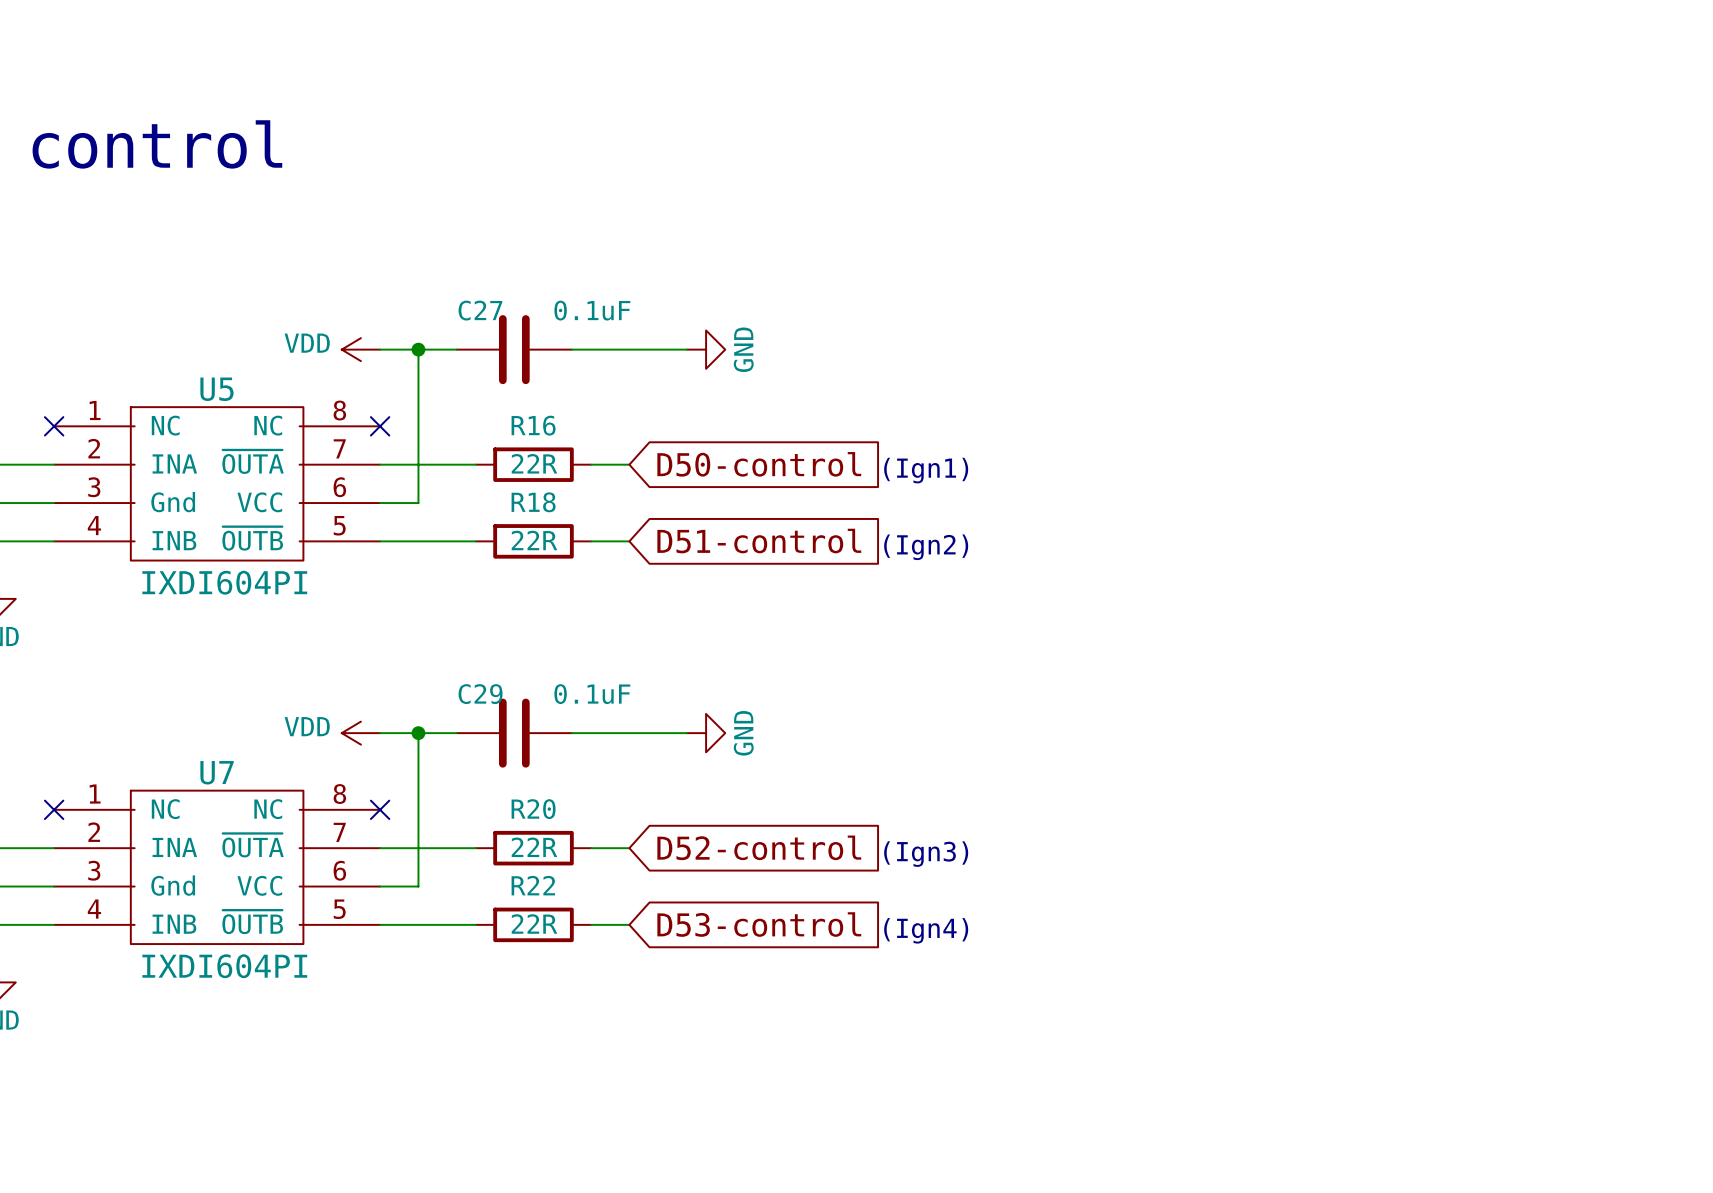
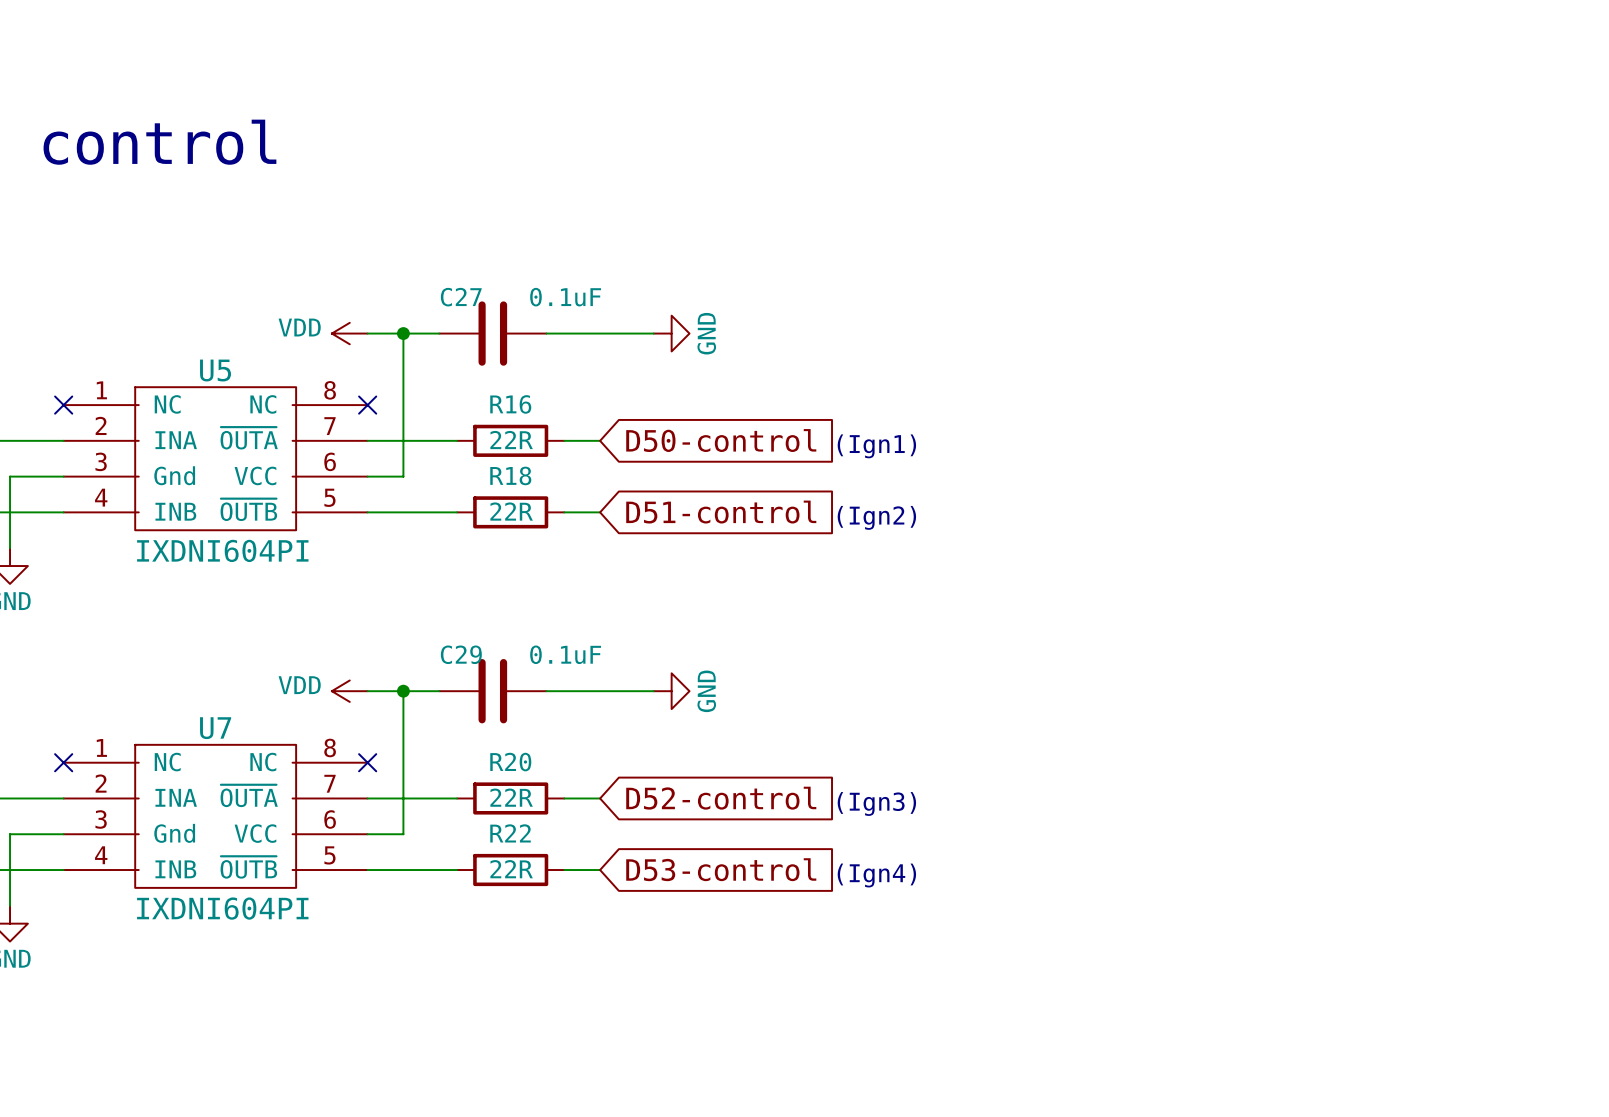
U5 value: IXDI604PI (224, 582) -> IXDNI604PI (222, 550)
U7 value: IXDI604PI (224, 966) -> IXDNI604PI (222, 908)

